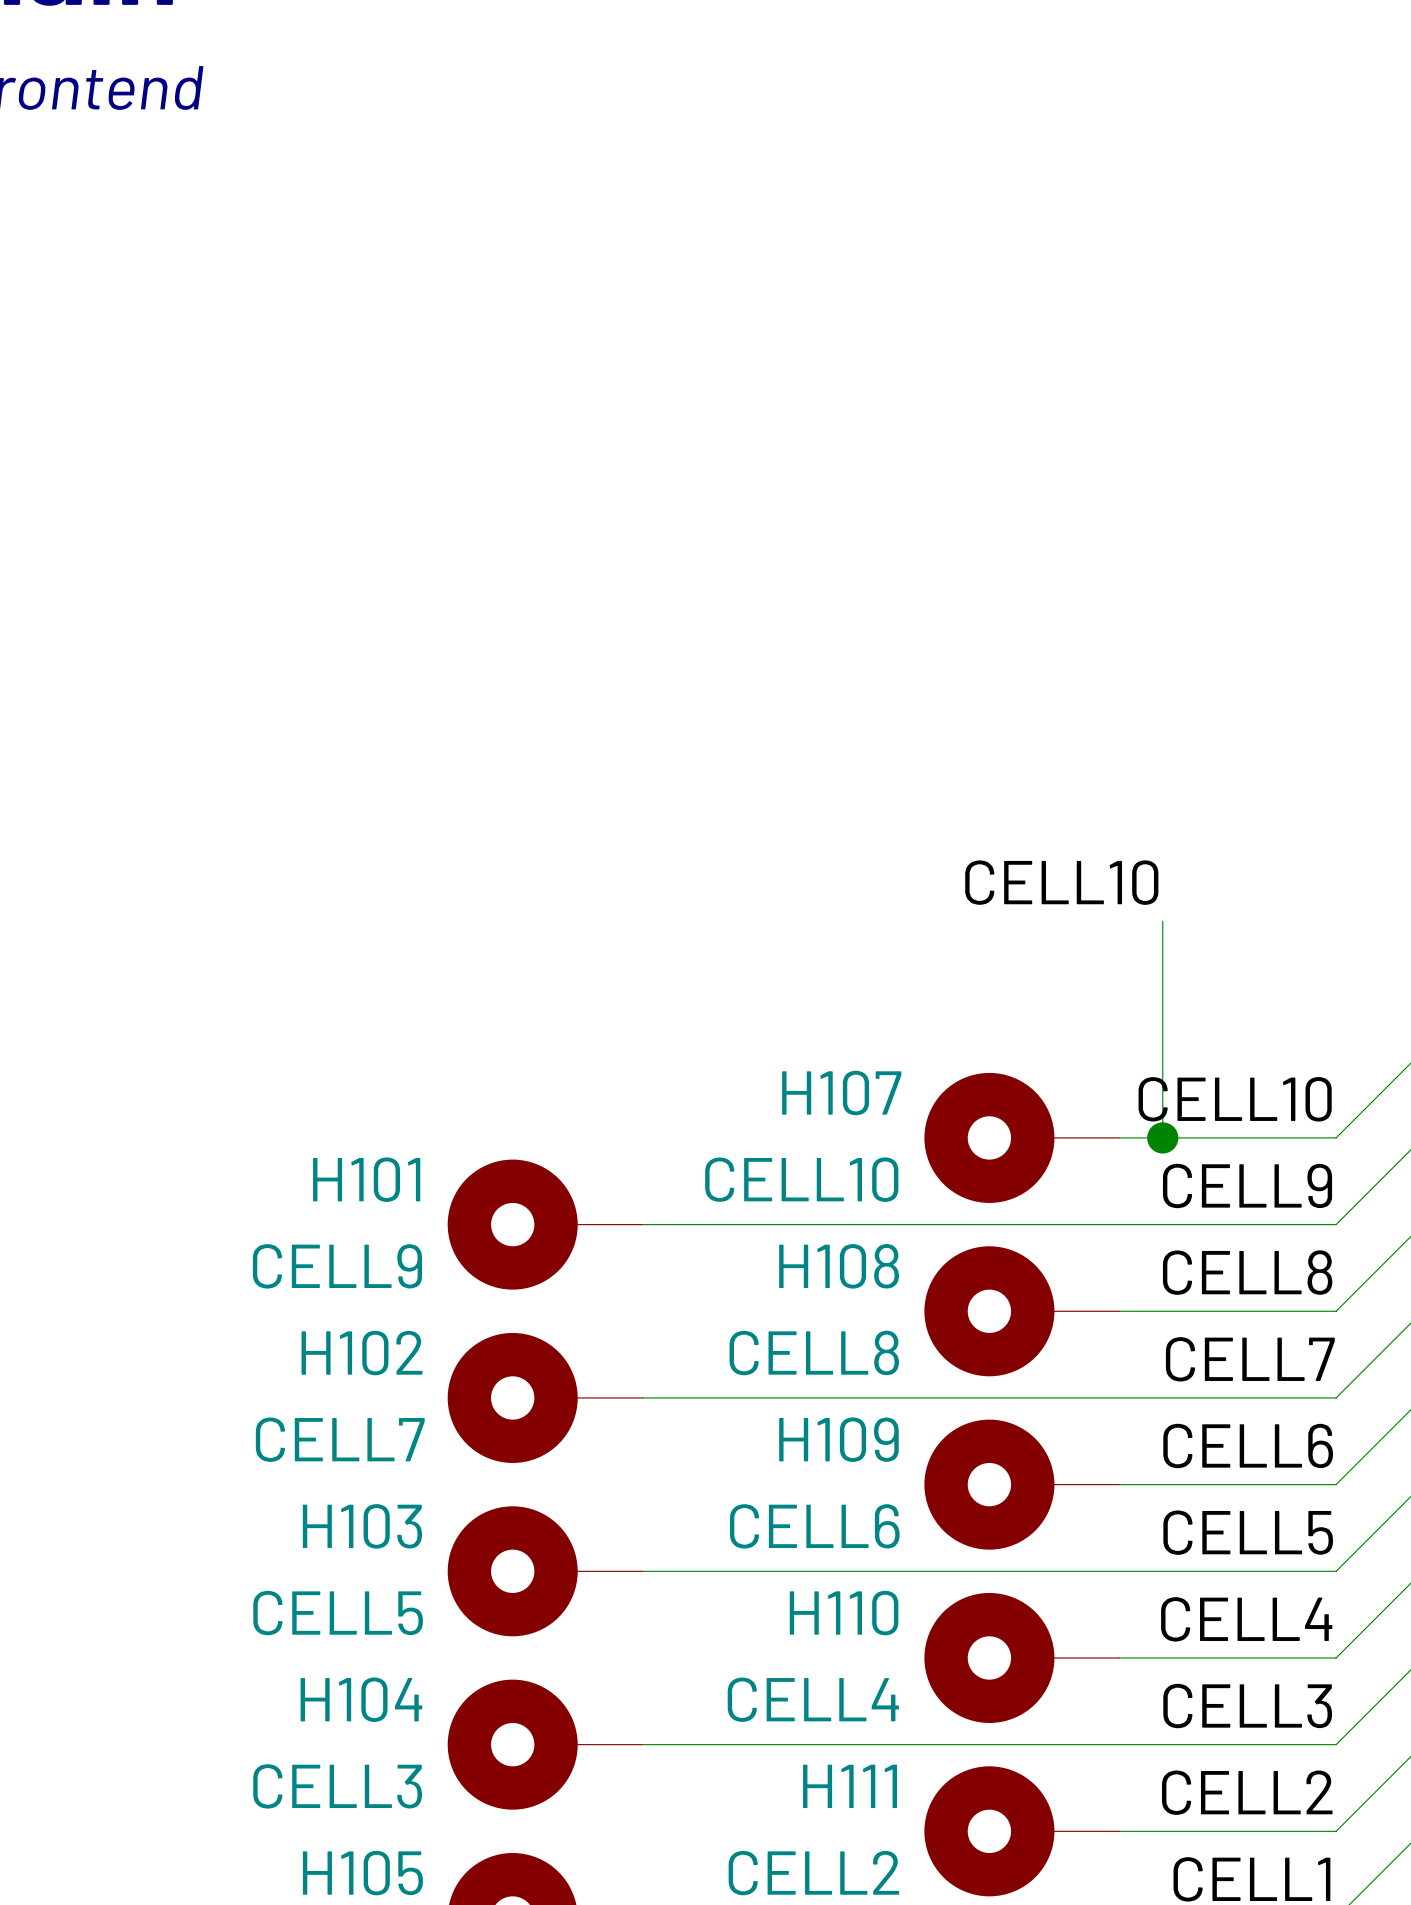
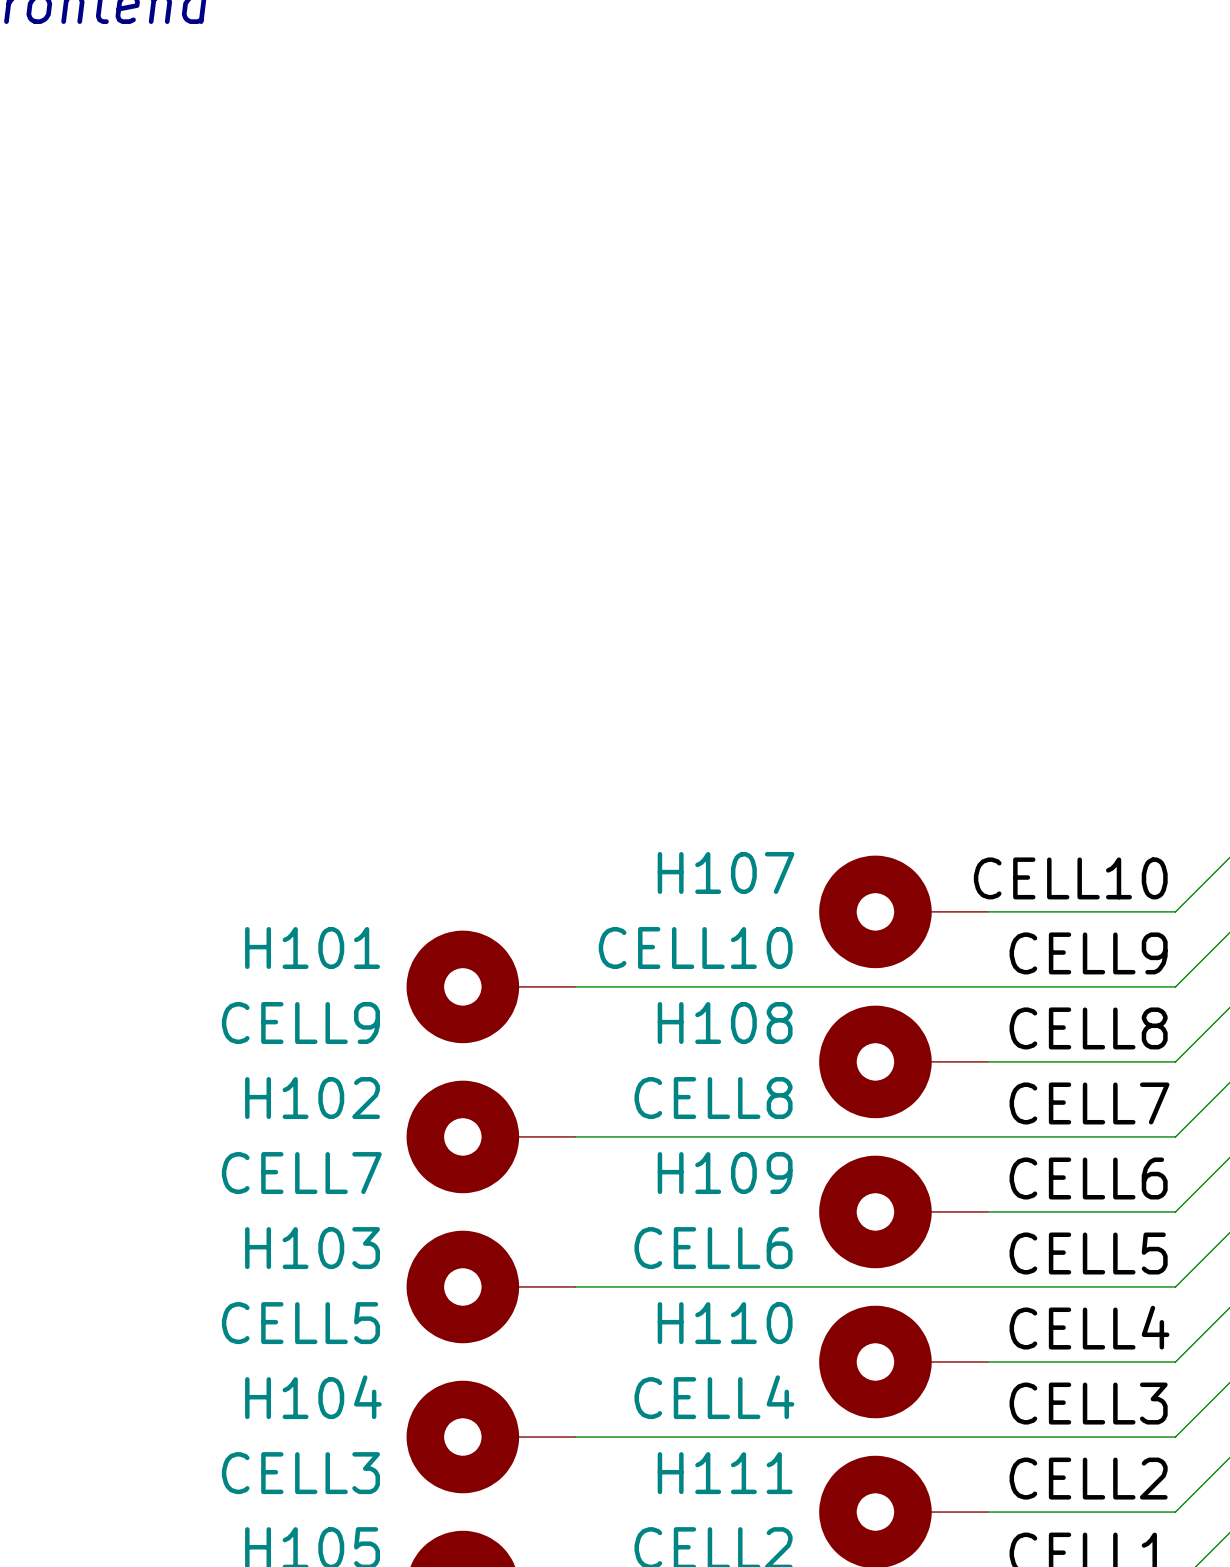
label: CELL10 (1061, 882) -> none
wire: (1162, 921) (1162, 1137) -> none
junction: (1162, 1137) -> none

